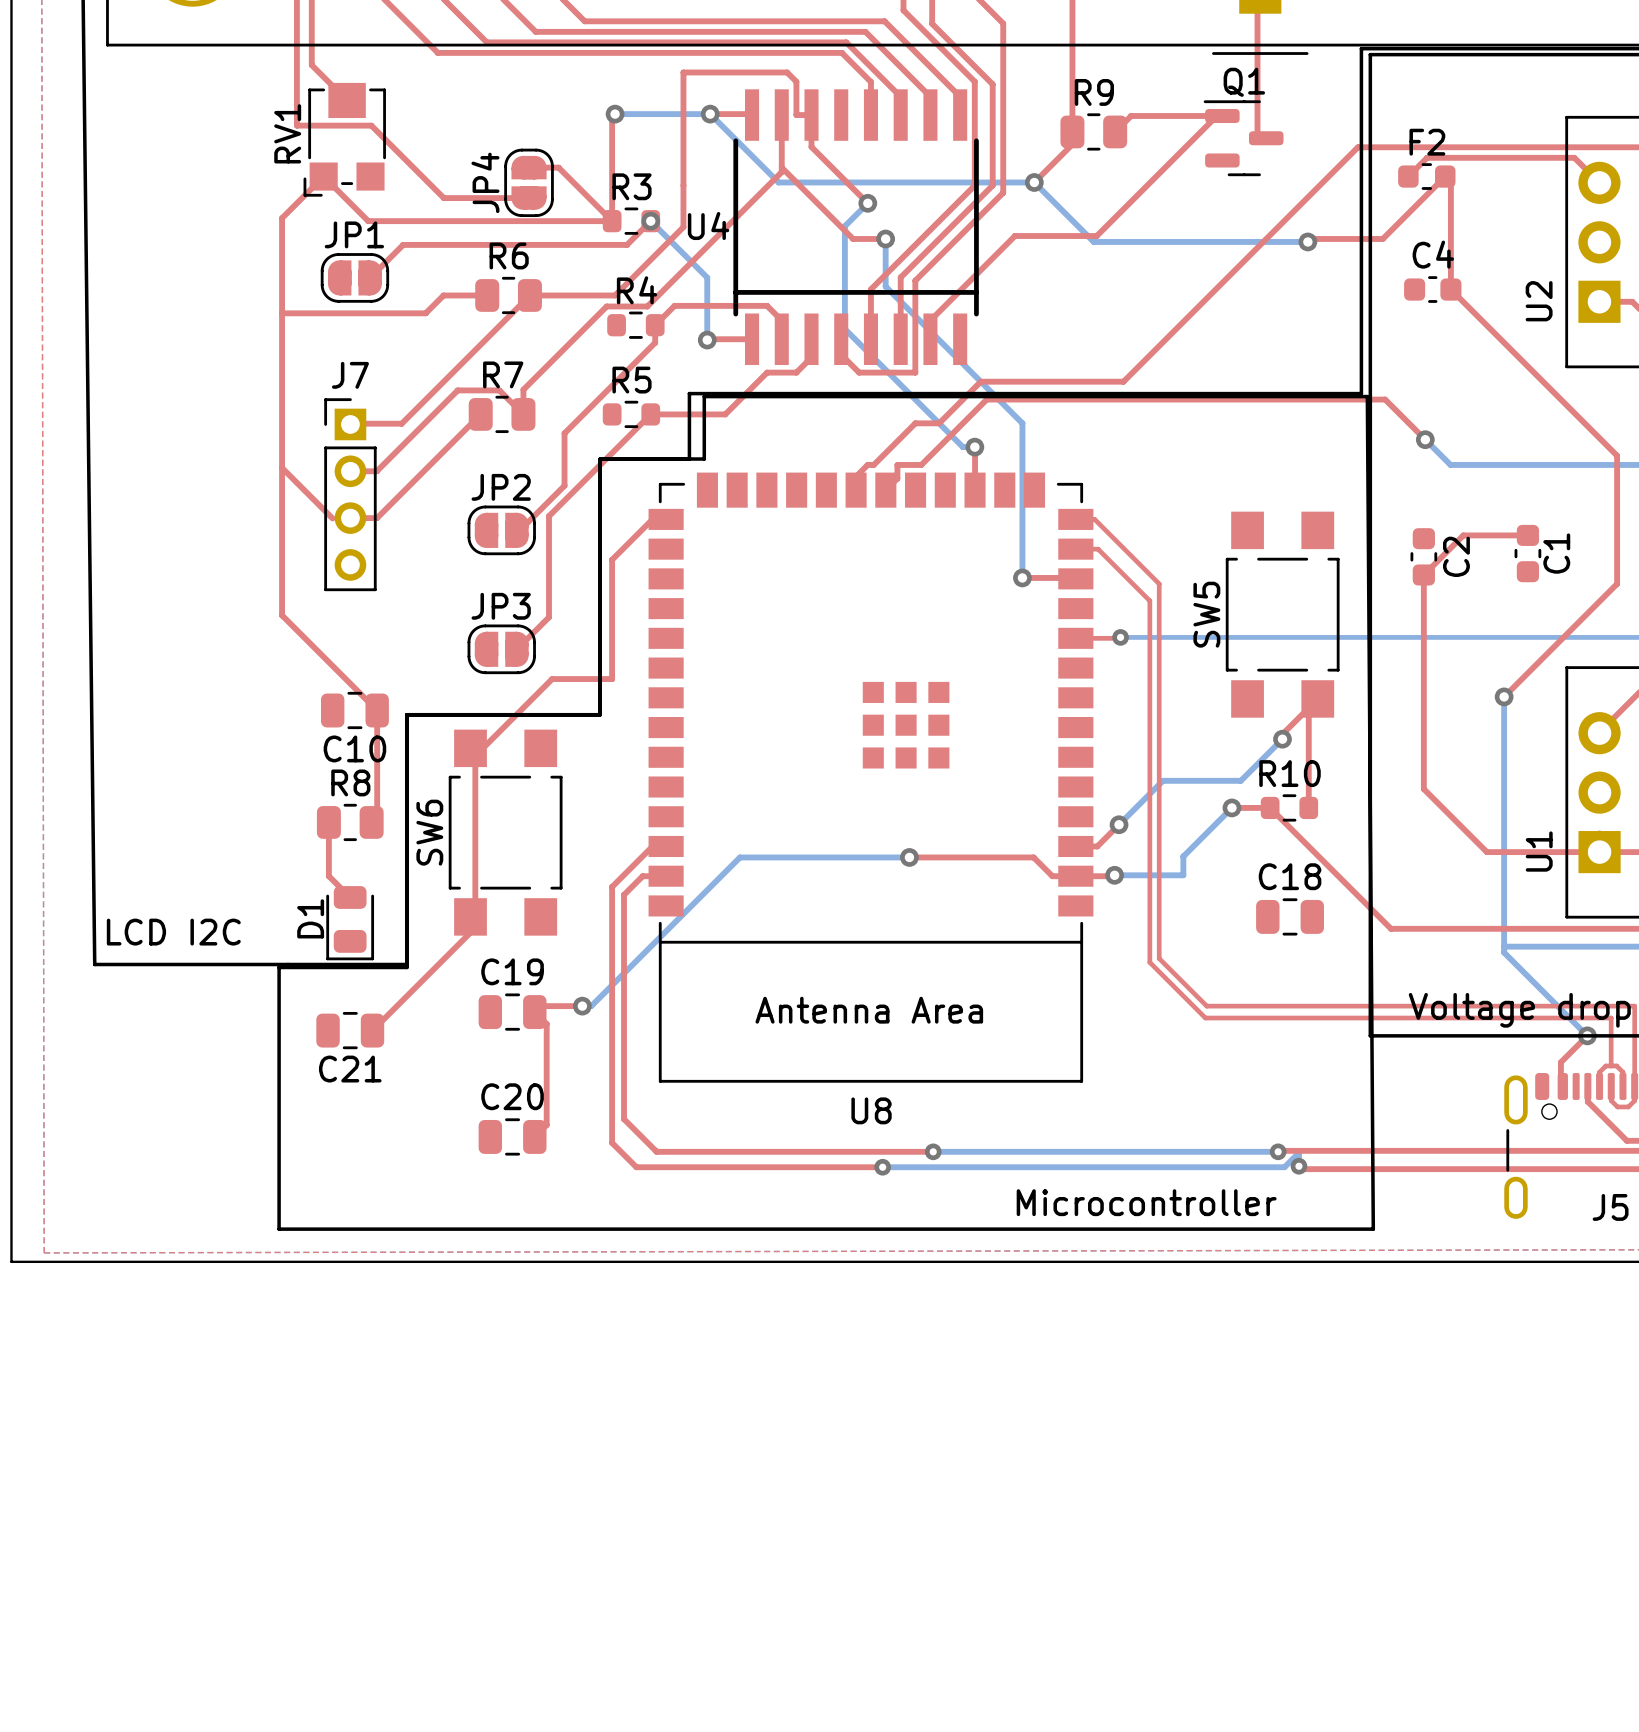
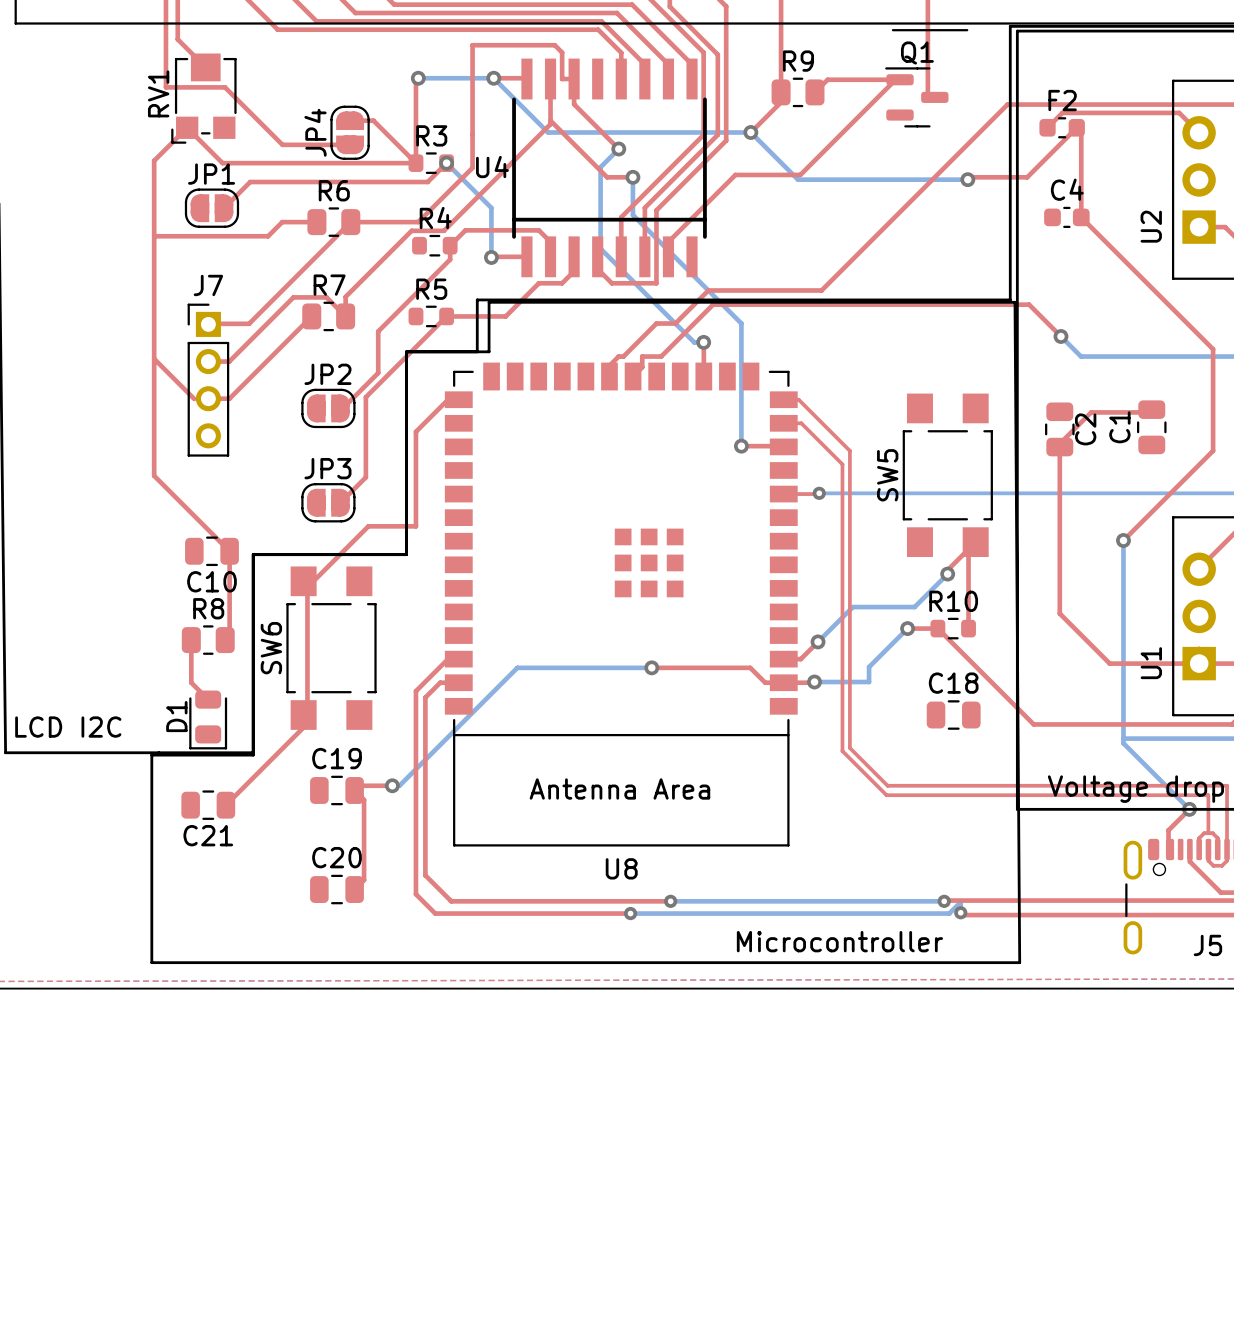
C1 footprint: [1514, 524, 1542, 583] -> [1137, 400, 1167, 455]
C2 footprint: [1410, 528, 1438, 586] -> [1045, 402, 1075, 457]
C1 name position: C1 (1556, 553) -> C1 (1119, 427)

